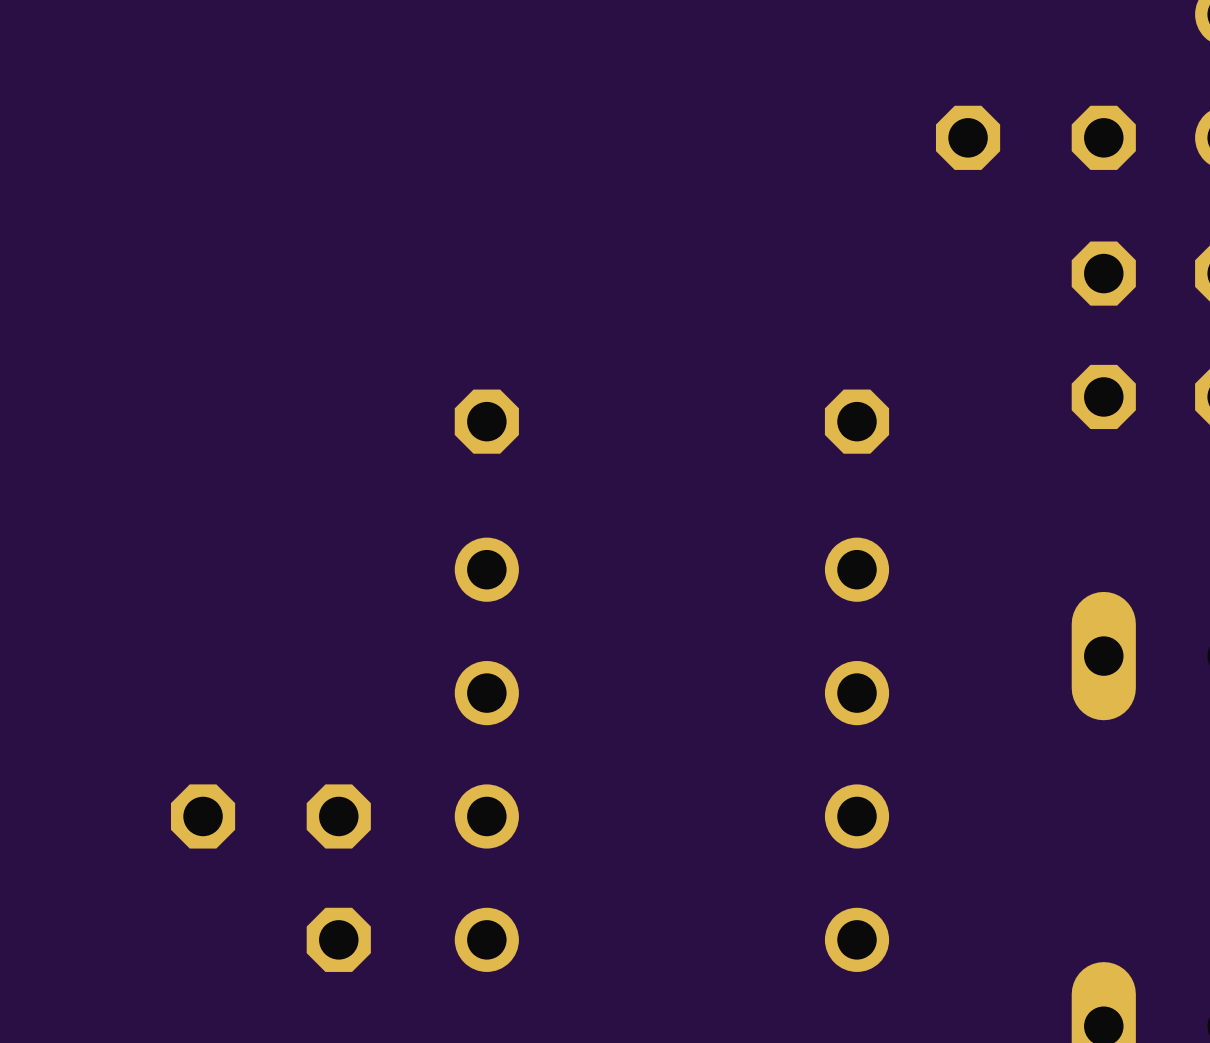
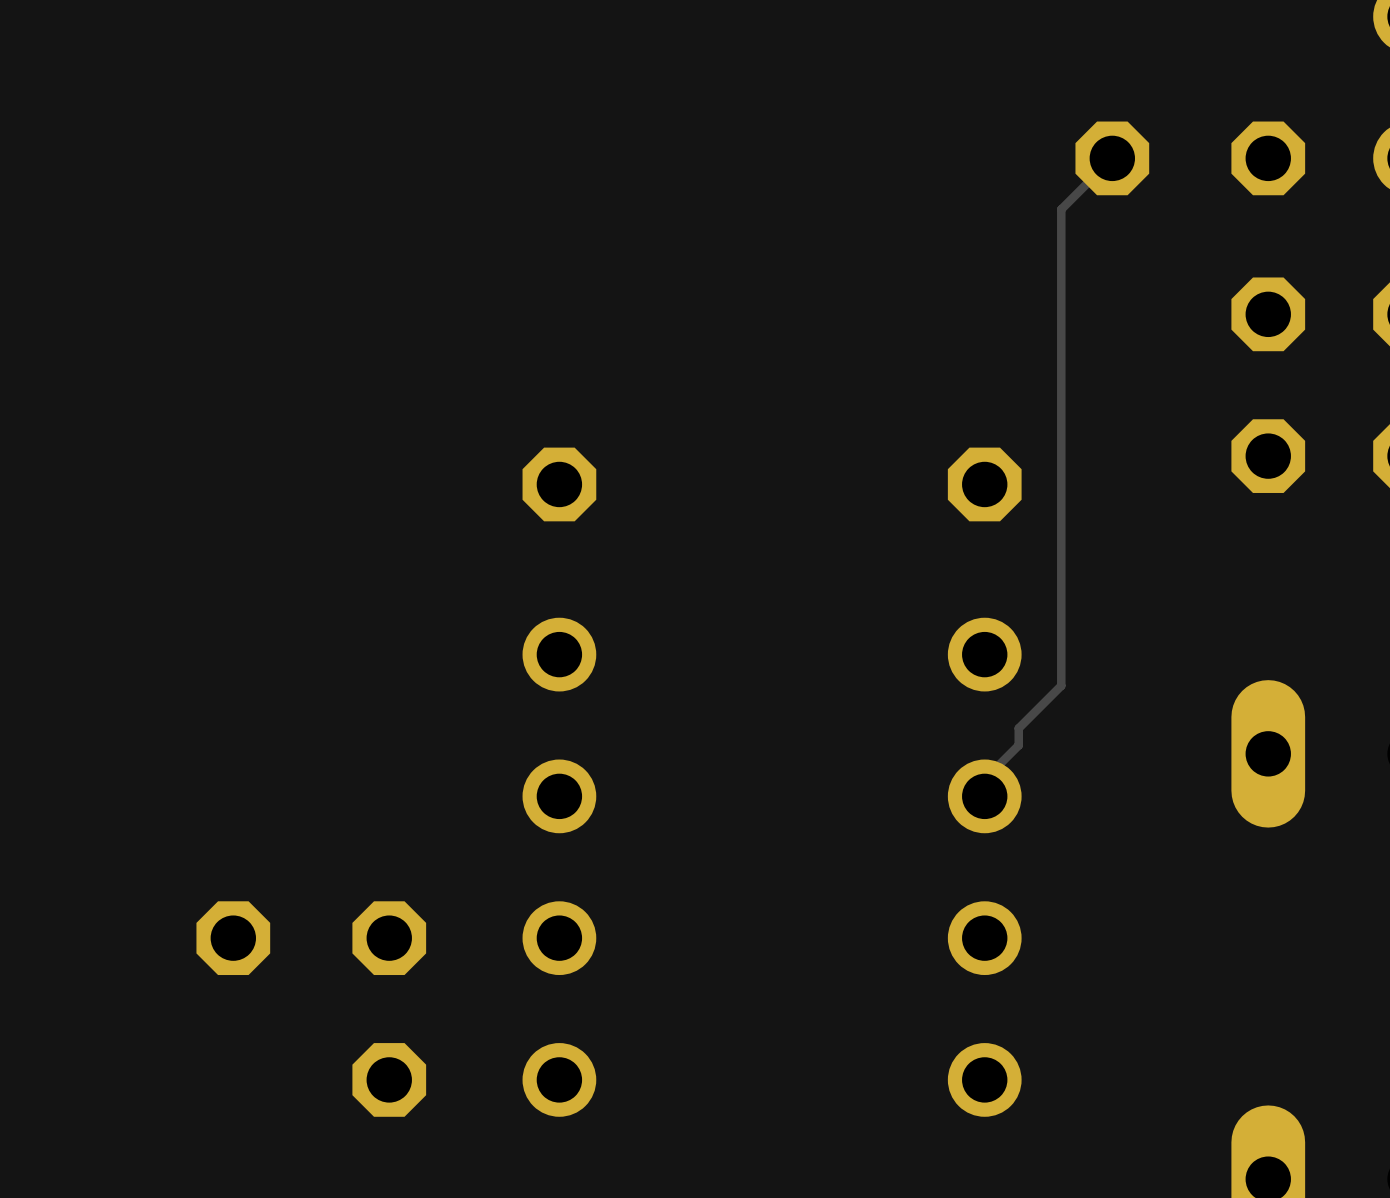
track: none -> (1112, 158) (1061, 209) (1061, 685) (1018, 728) (1018, 745) (984, 779) (984, 796)

